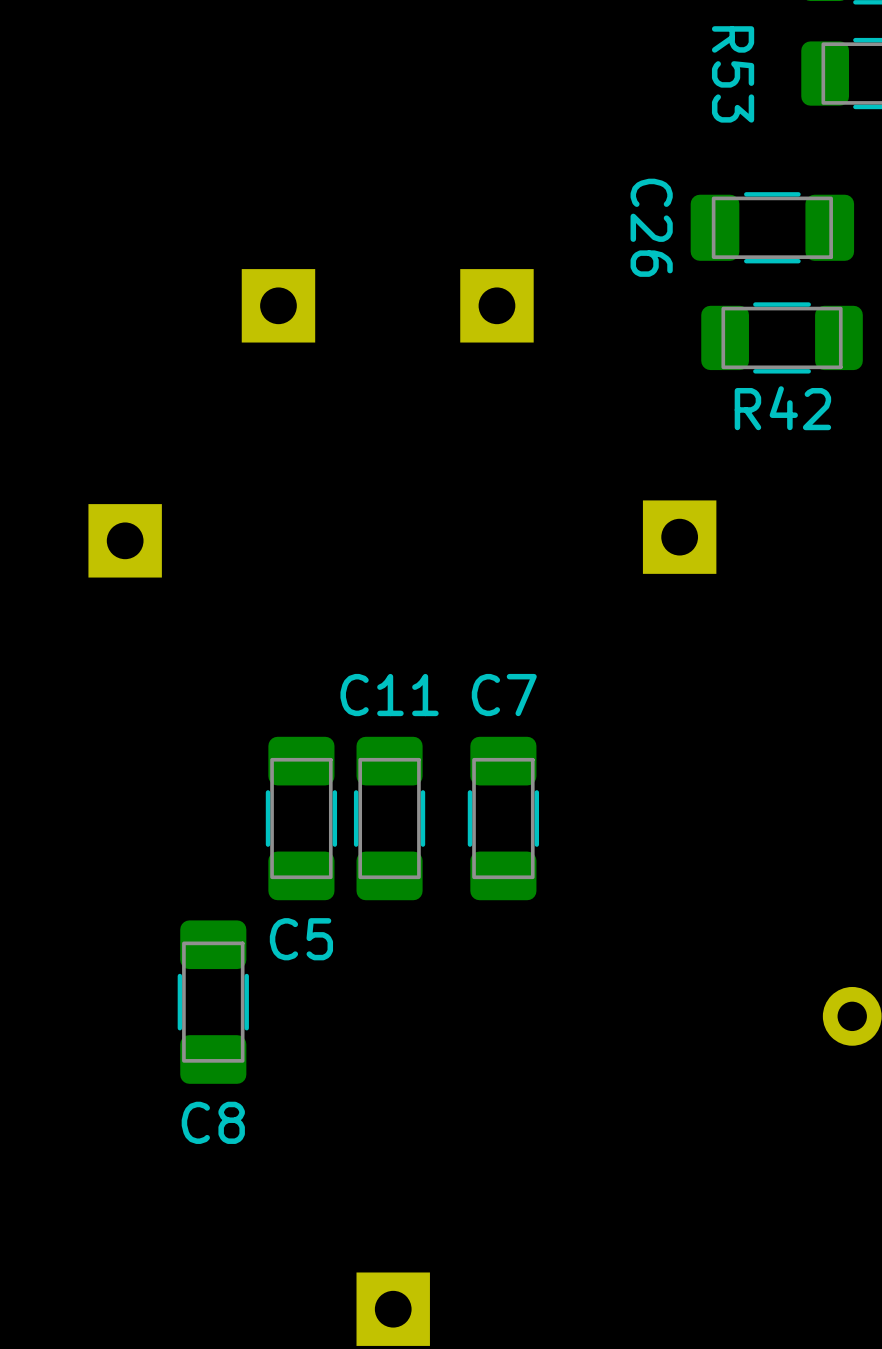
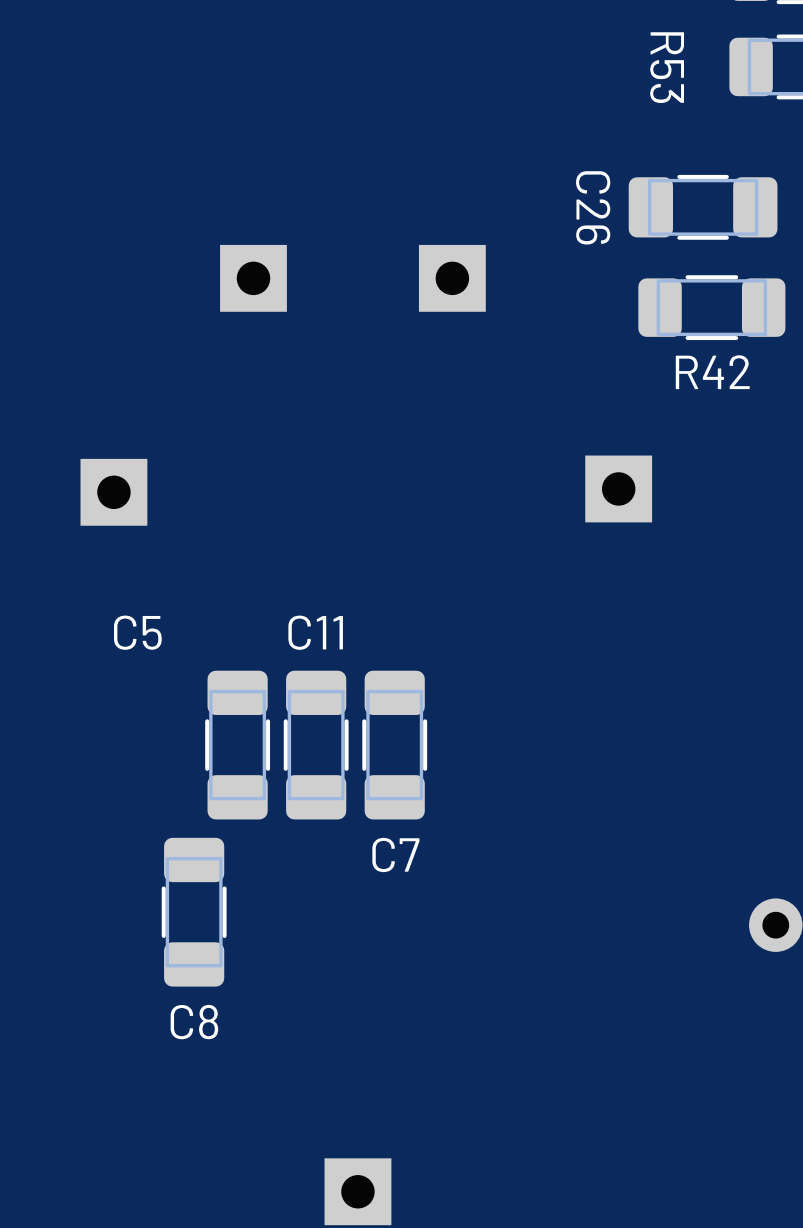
C7 name position: C7 (504, 695) -> C7 (395, 855)
C5 position: (301, 818) -> (237, 745)
C11 position: (389, 818) -> (316, 745)
C7 position: (503, 818) -> (394, 745)
C5 name position: C5 (301, 939) -> C5 (137, 632)

